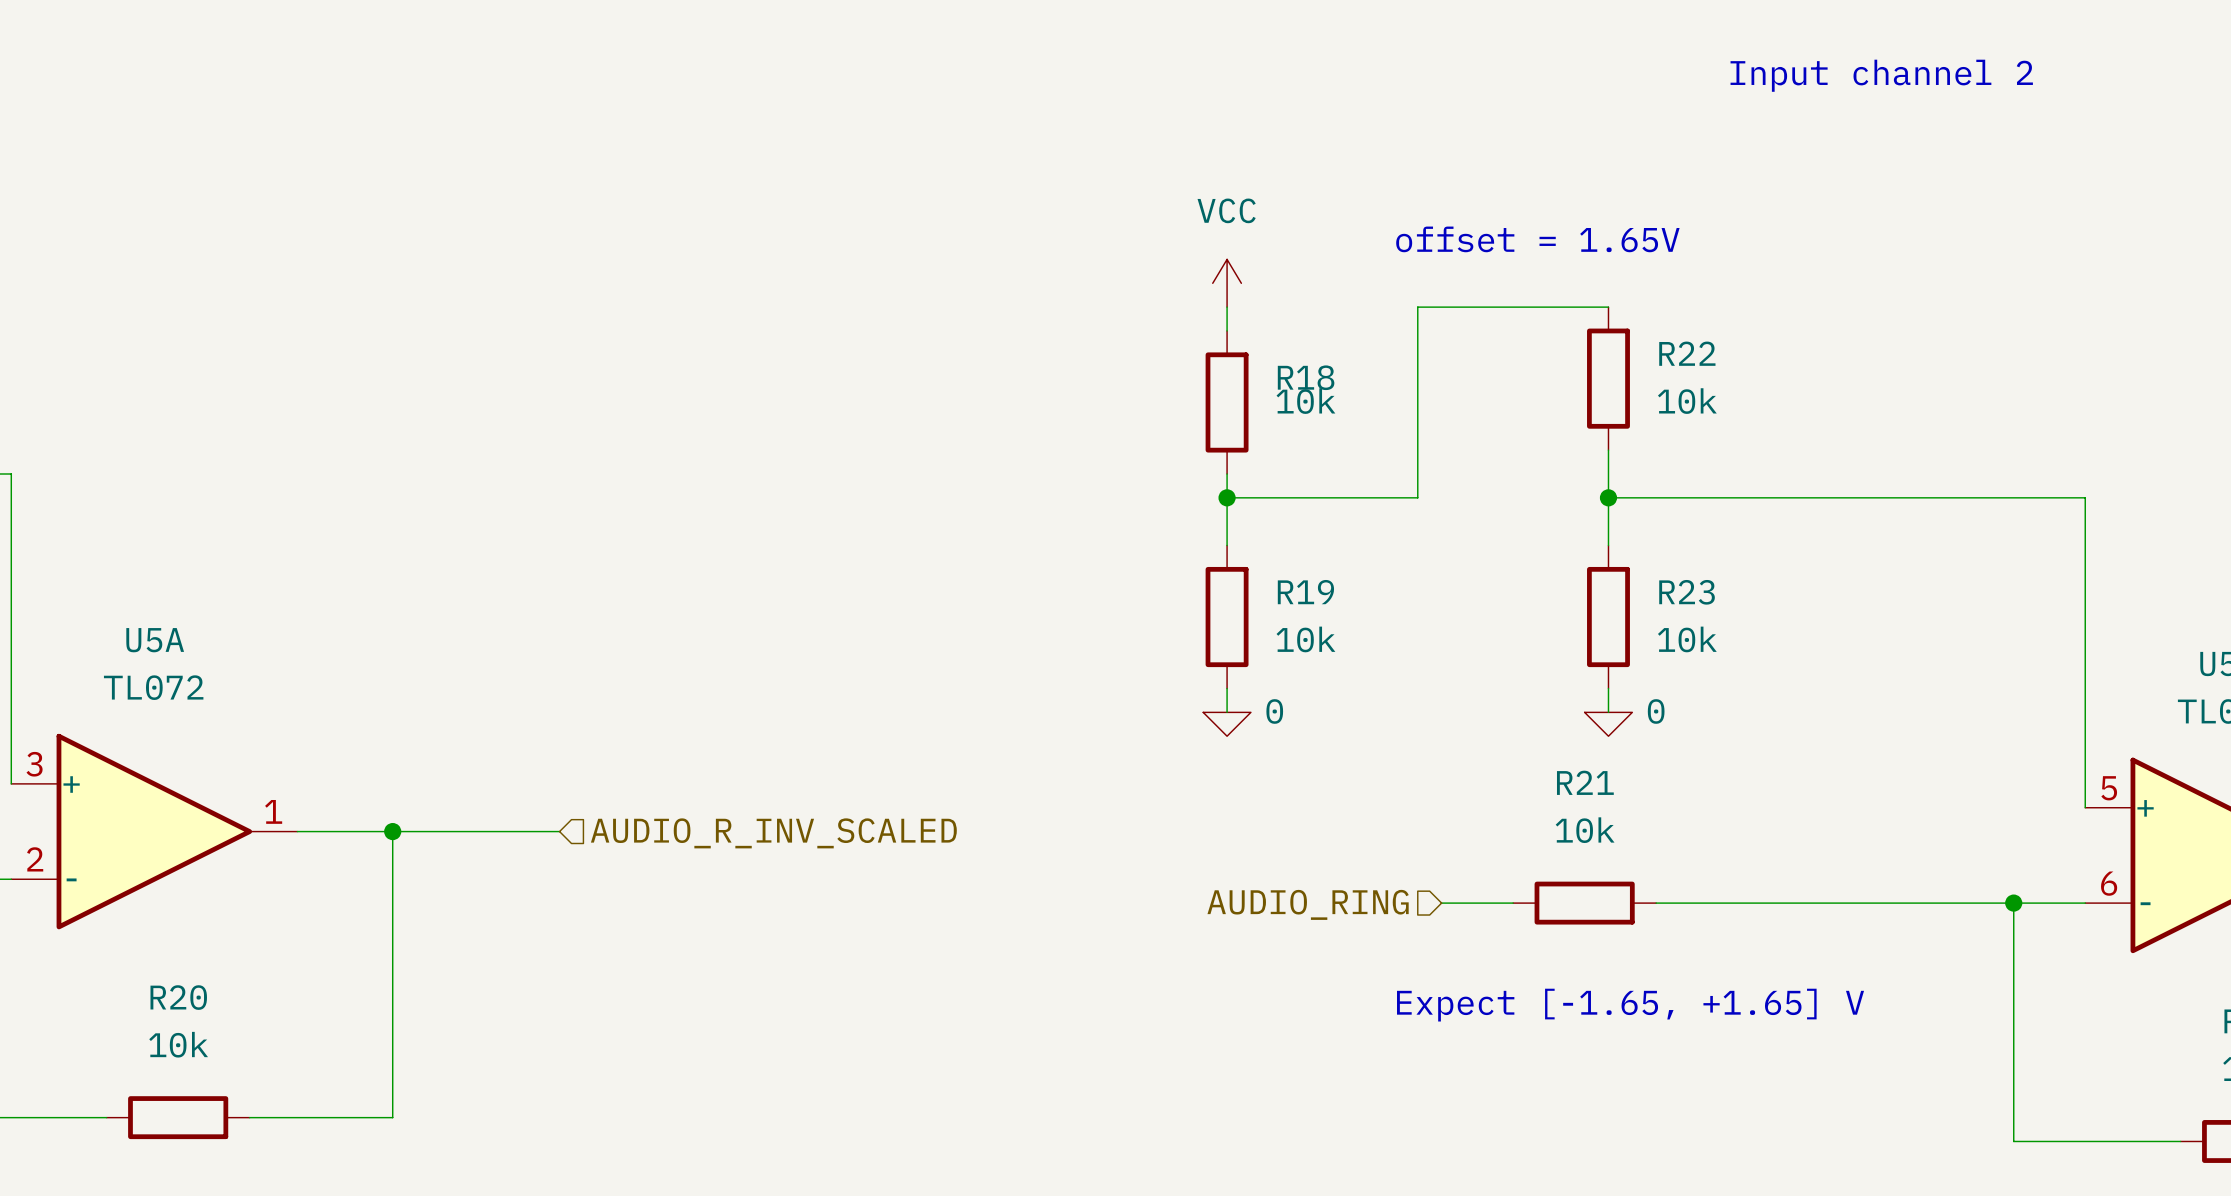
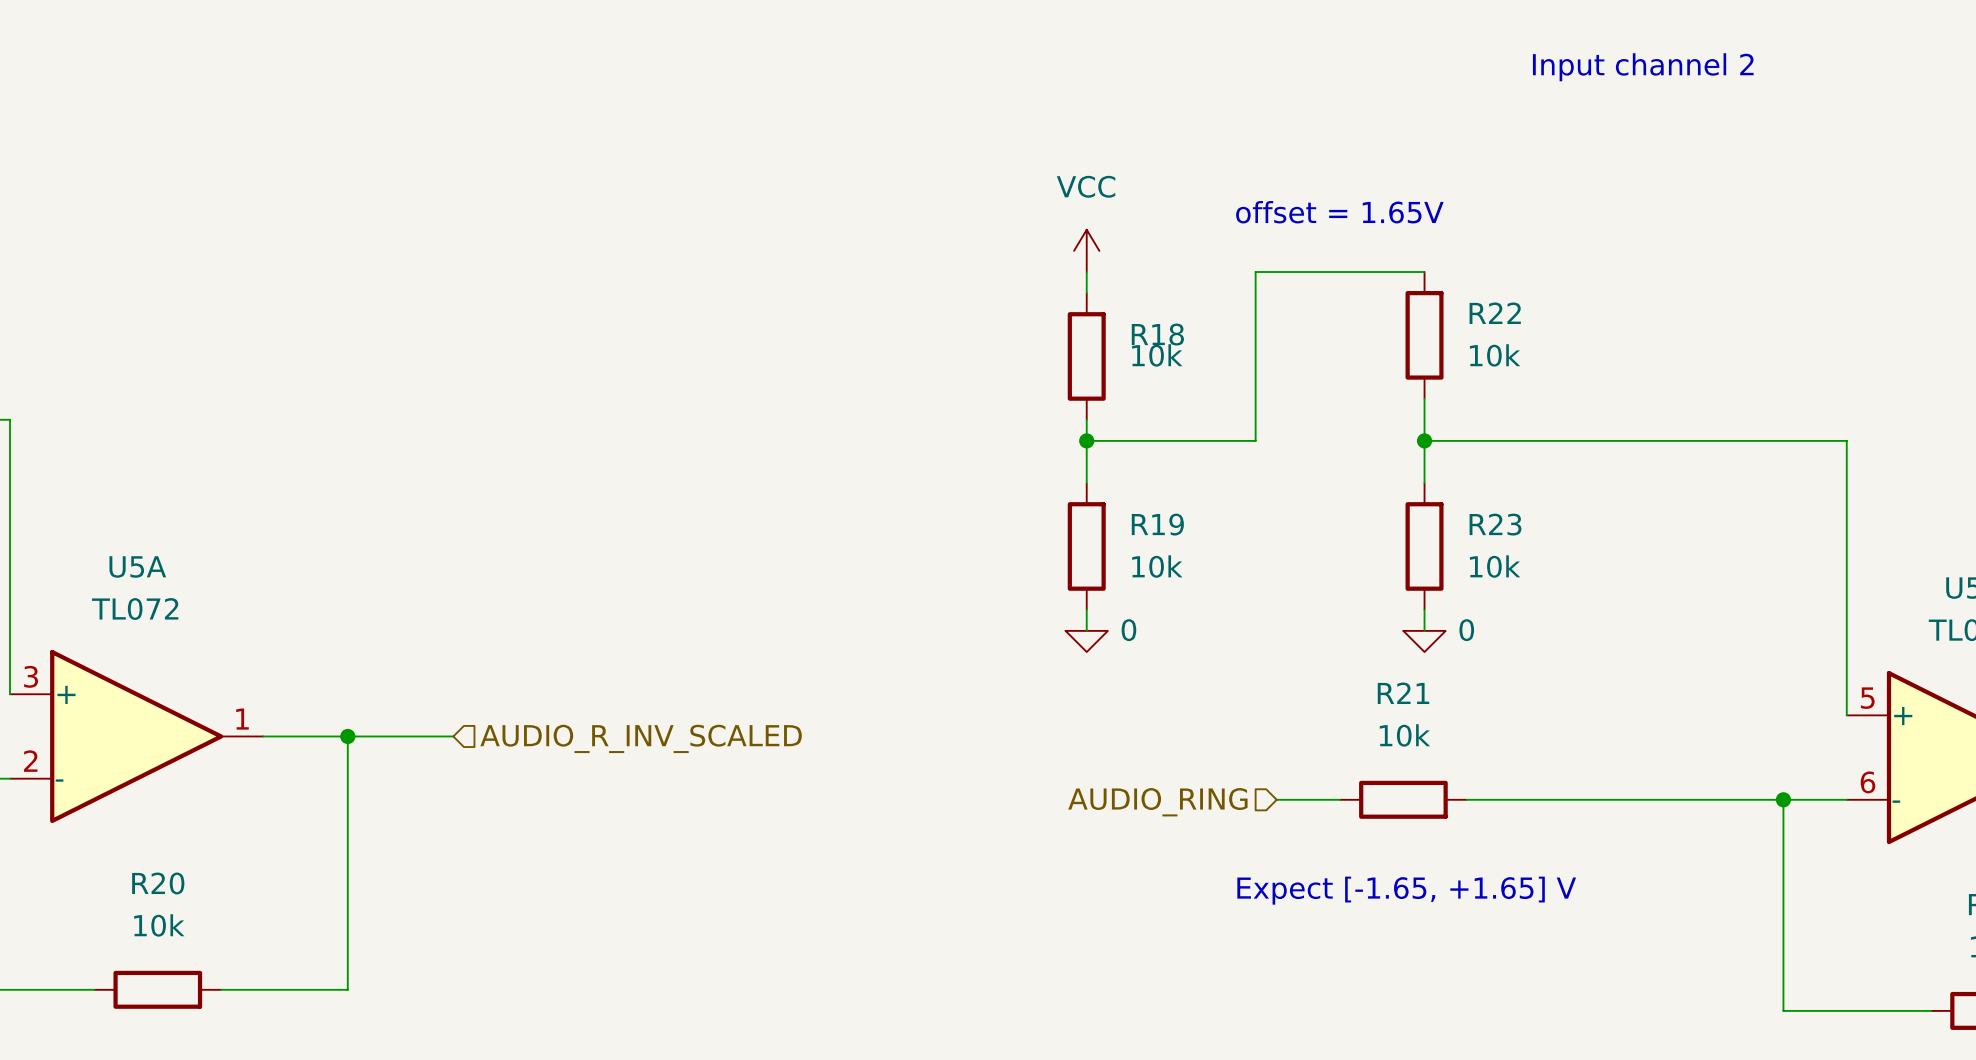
wire: (511, 831) (559, 831) -> none
hierarchical label position: AUDIO_R_INV_SCALED (773, 833) -> AUDIO_R_INV_SCALED (641, 738)

